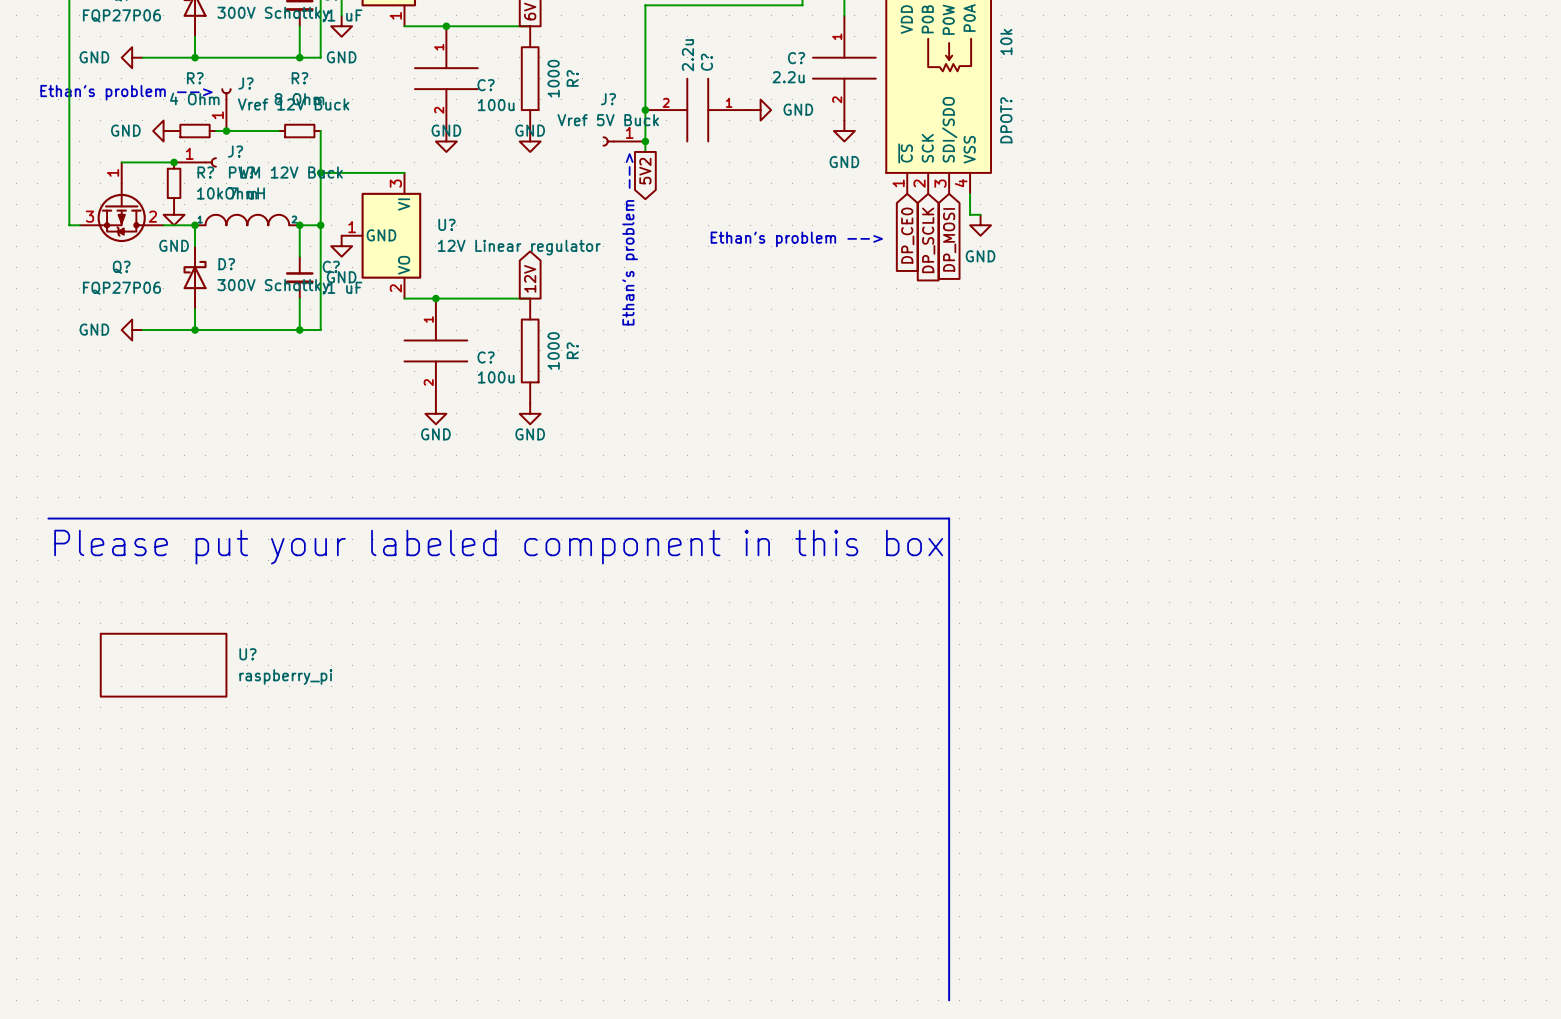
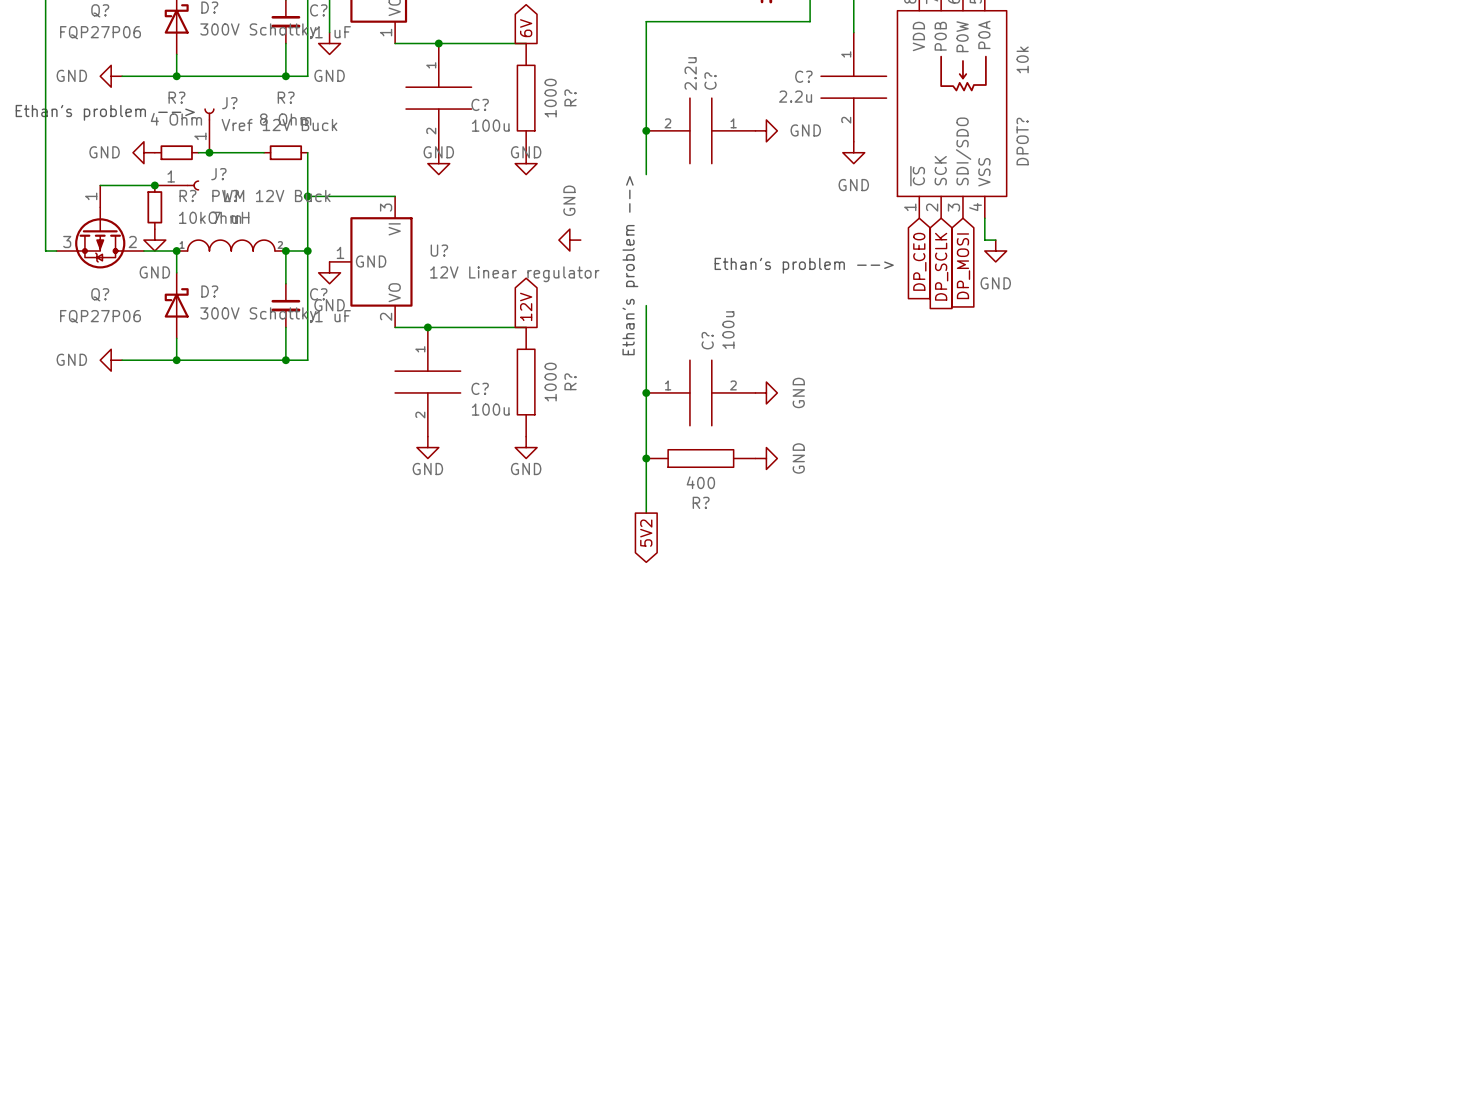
J?: Vref 5V Buck (624, 141) -> none
junction: (645, 141) -> none
global label: 5V2 (645, 171) -> none
power symbol: none -> GND (569, 240)
wire: none -> (646, 305) (646, 513)
junction: none -> (646, 392)
C?: none -> 100u (700, 392)
power symbol: none -> GND (766, 392)
junction: none -> (646, 458)
R?: none -> 400 (700, 458)
power symbol: none -> GND (766, 458)
global label: none -> 5V2 (646, 533)
line: (48, 518) (949, 518) (949, 1000) -> none
text: Please put your labeled component in this box (498, 547) -> none
U?: raspberry_pi (163, 665) -> none

